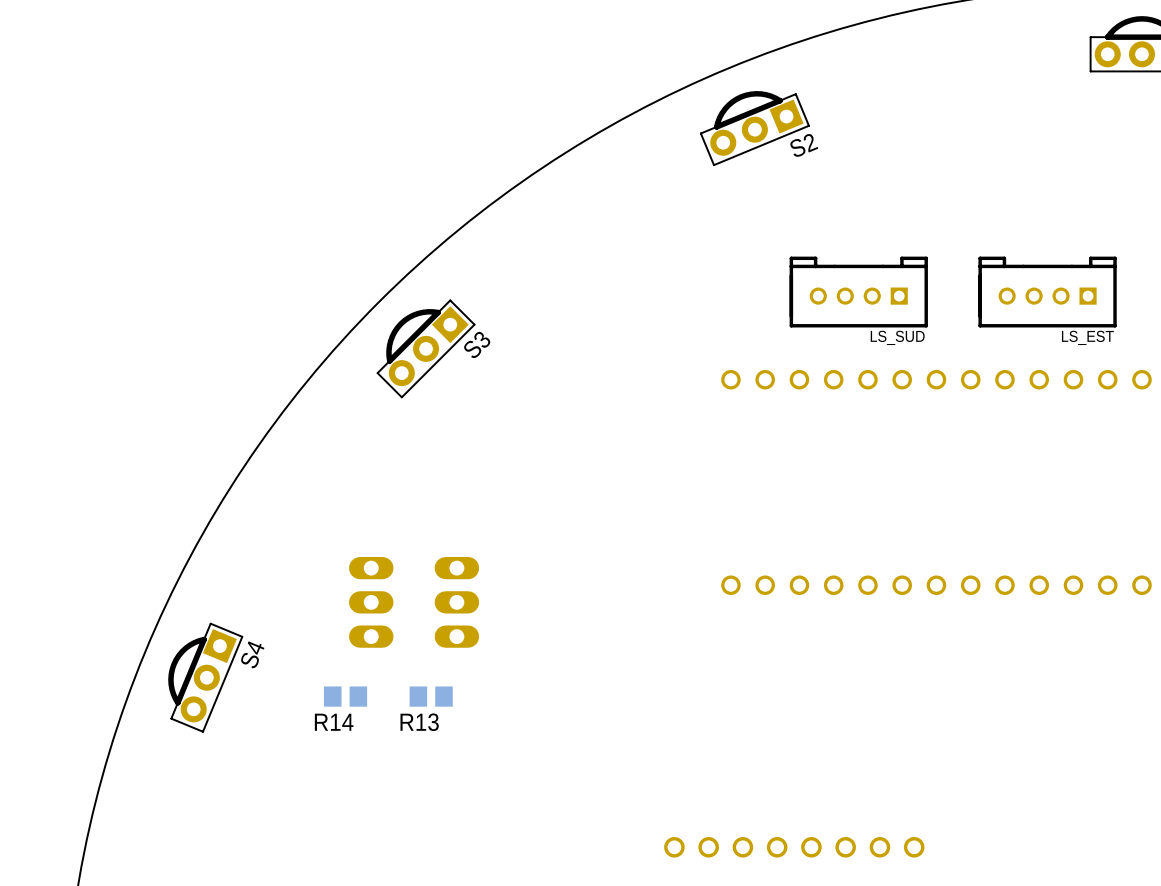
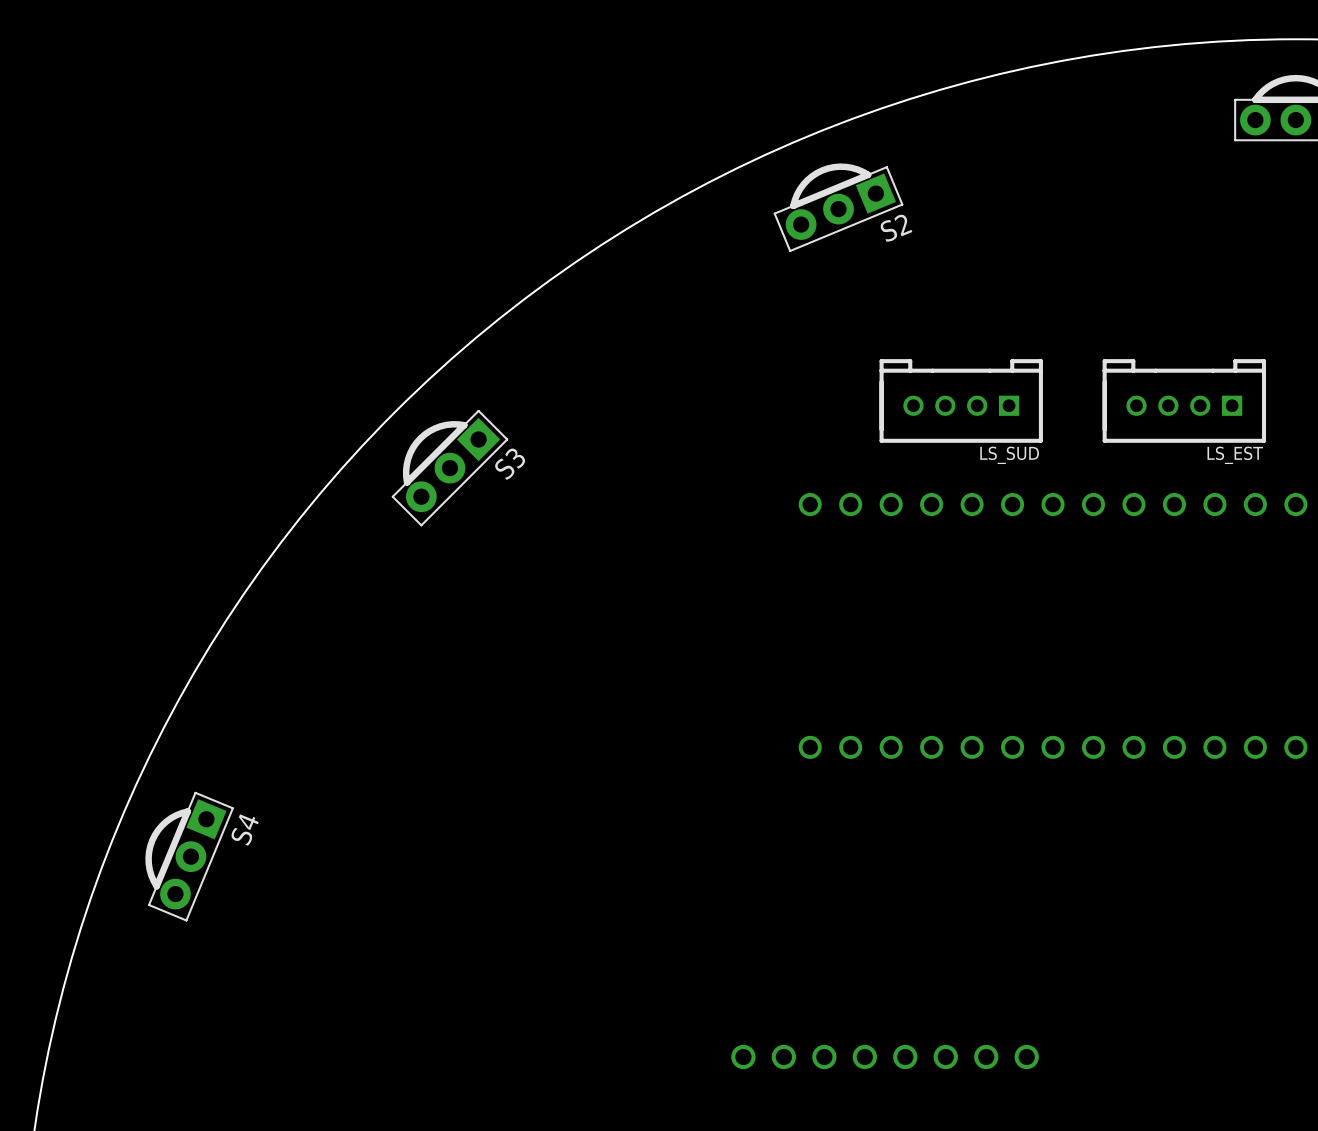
part: (371, 602) -> none
part: (456, 602) -> none
R14: (345, 696) -> none
R13: (431, 696) -> none

